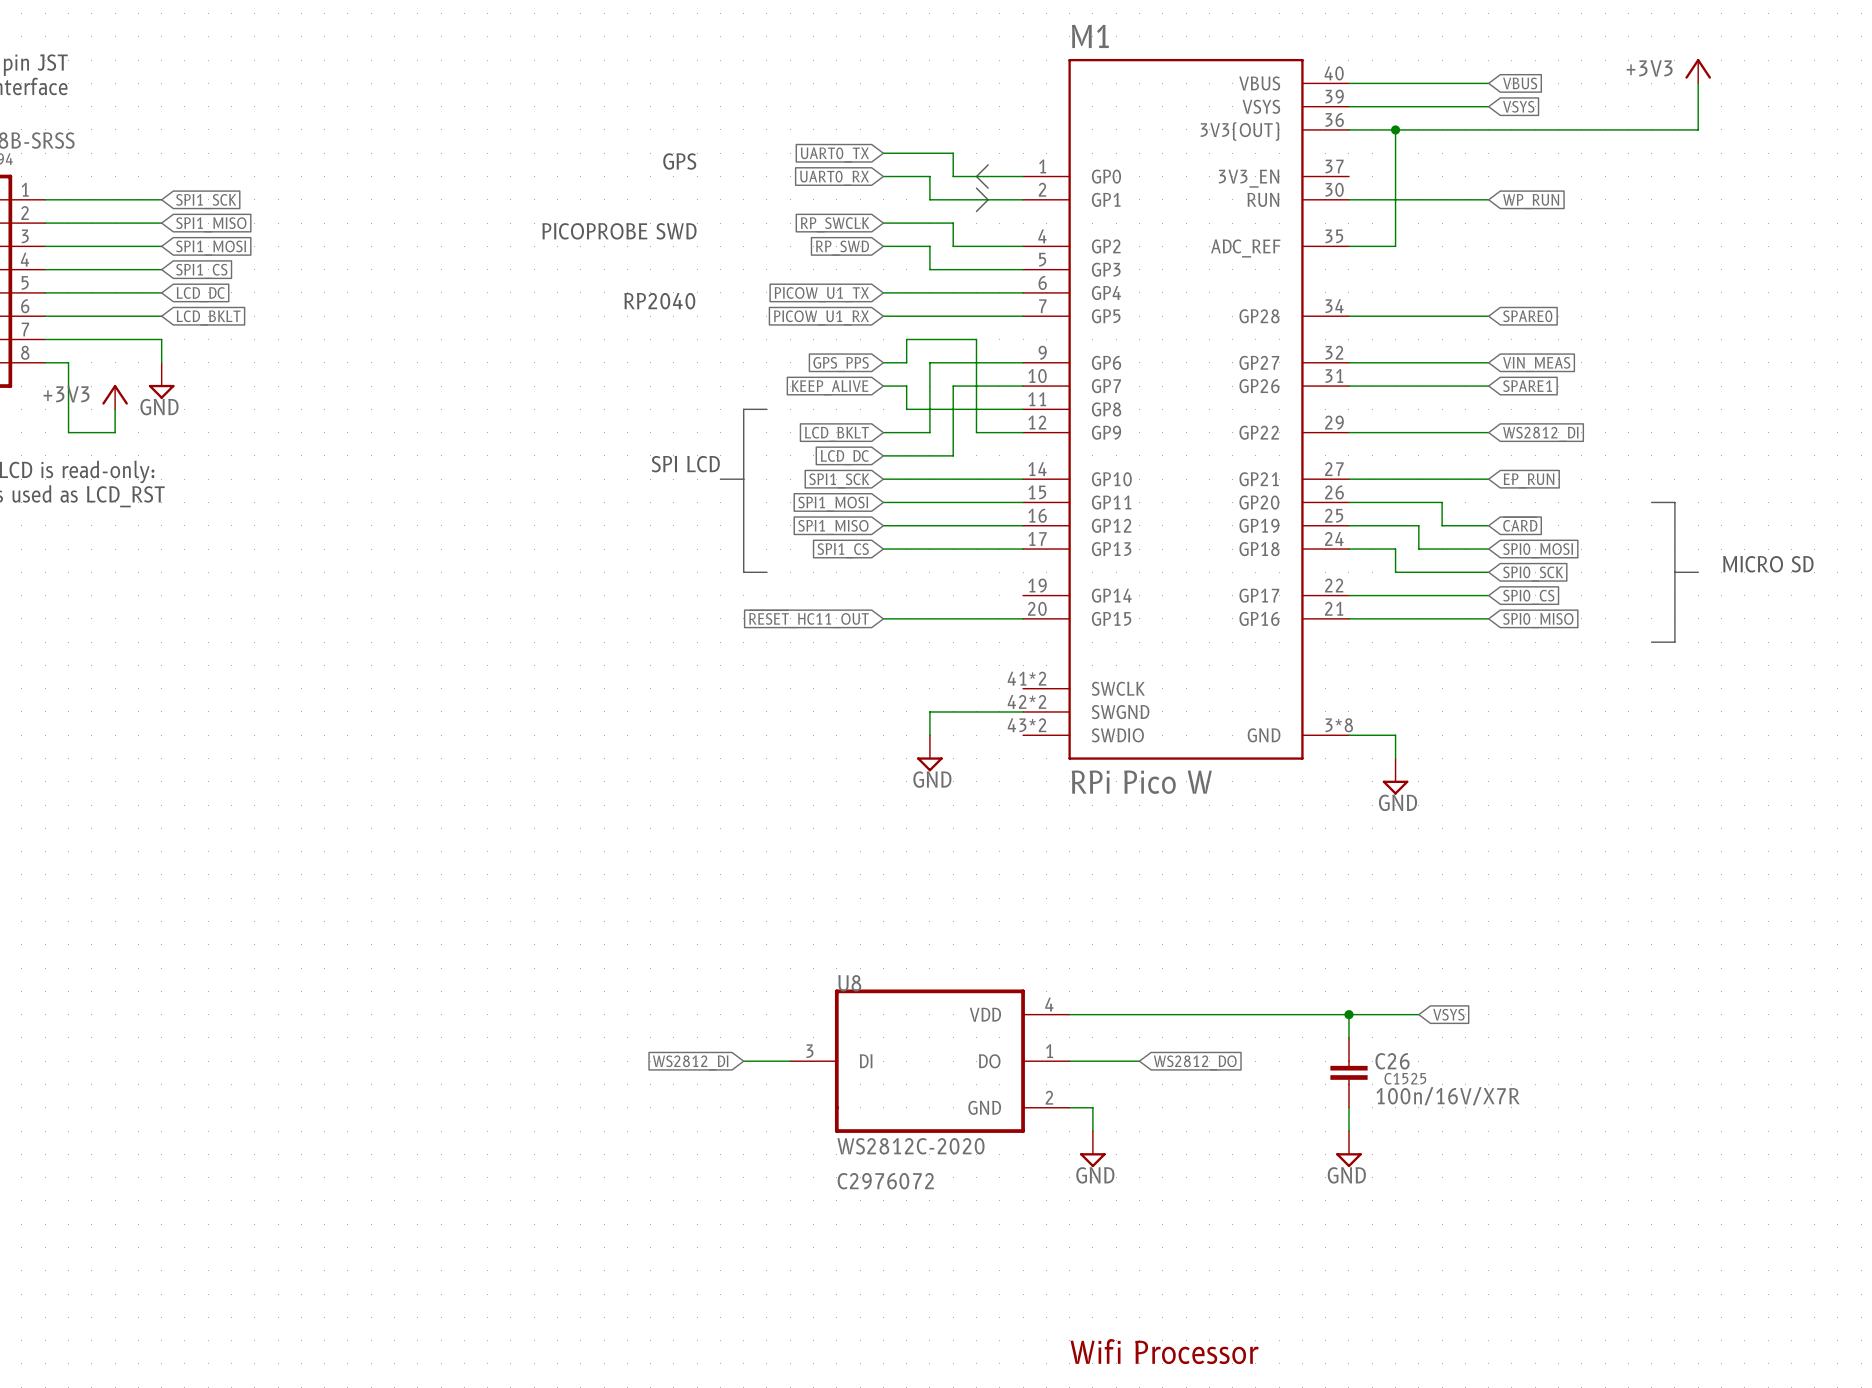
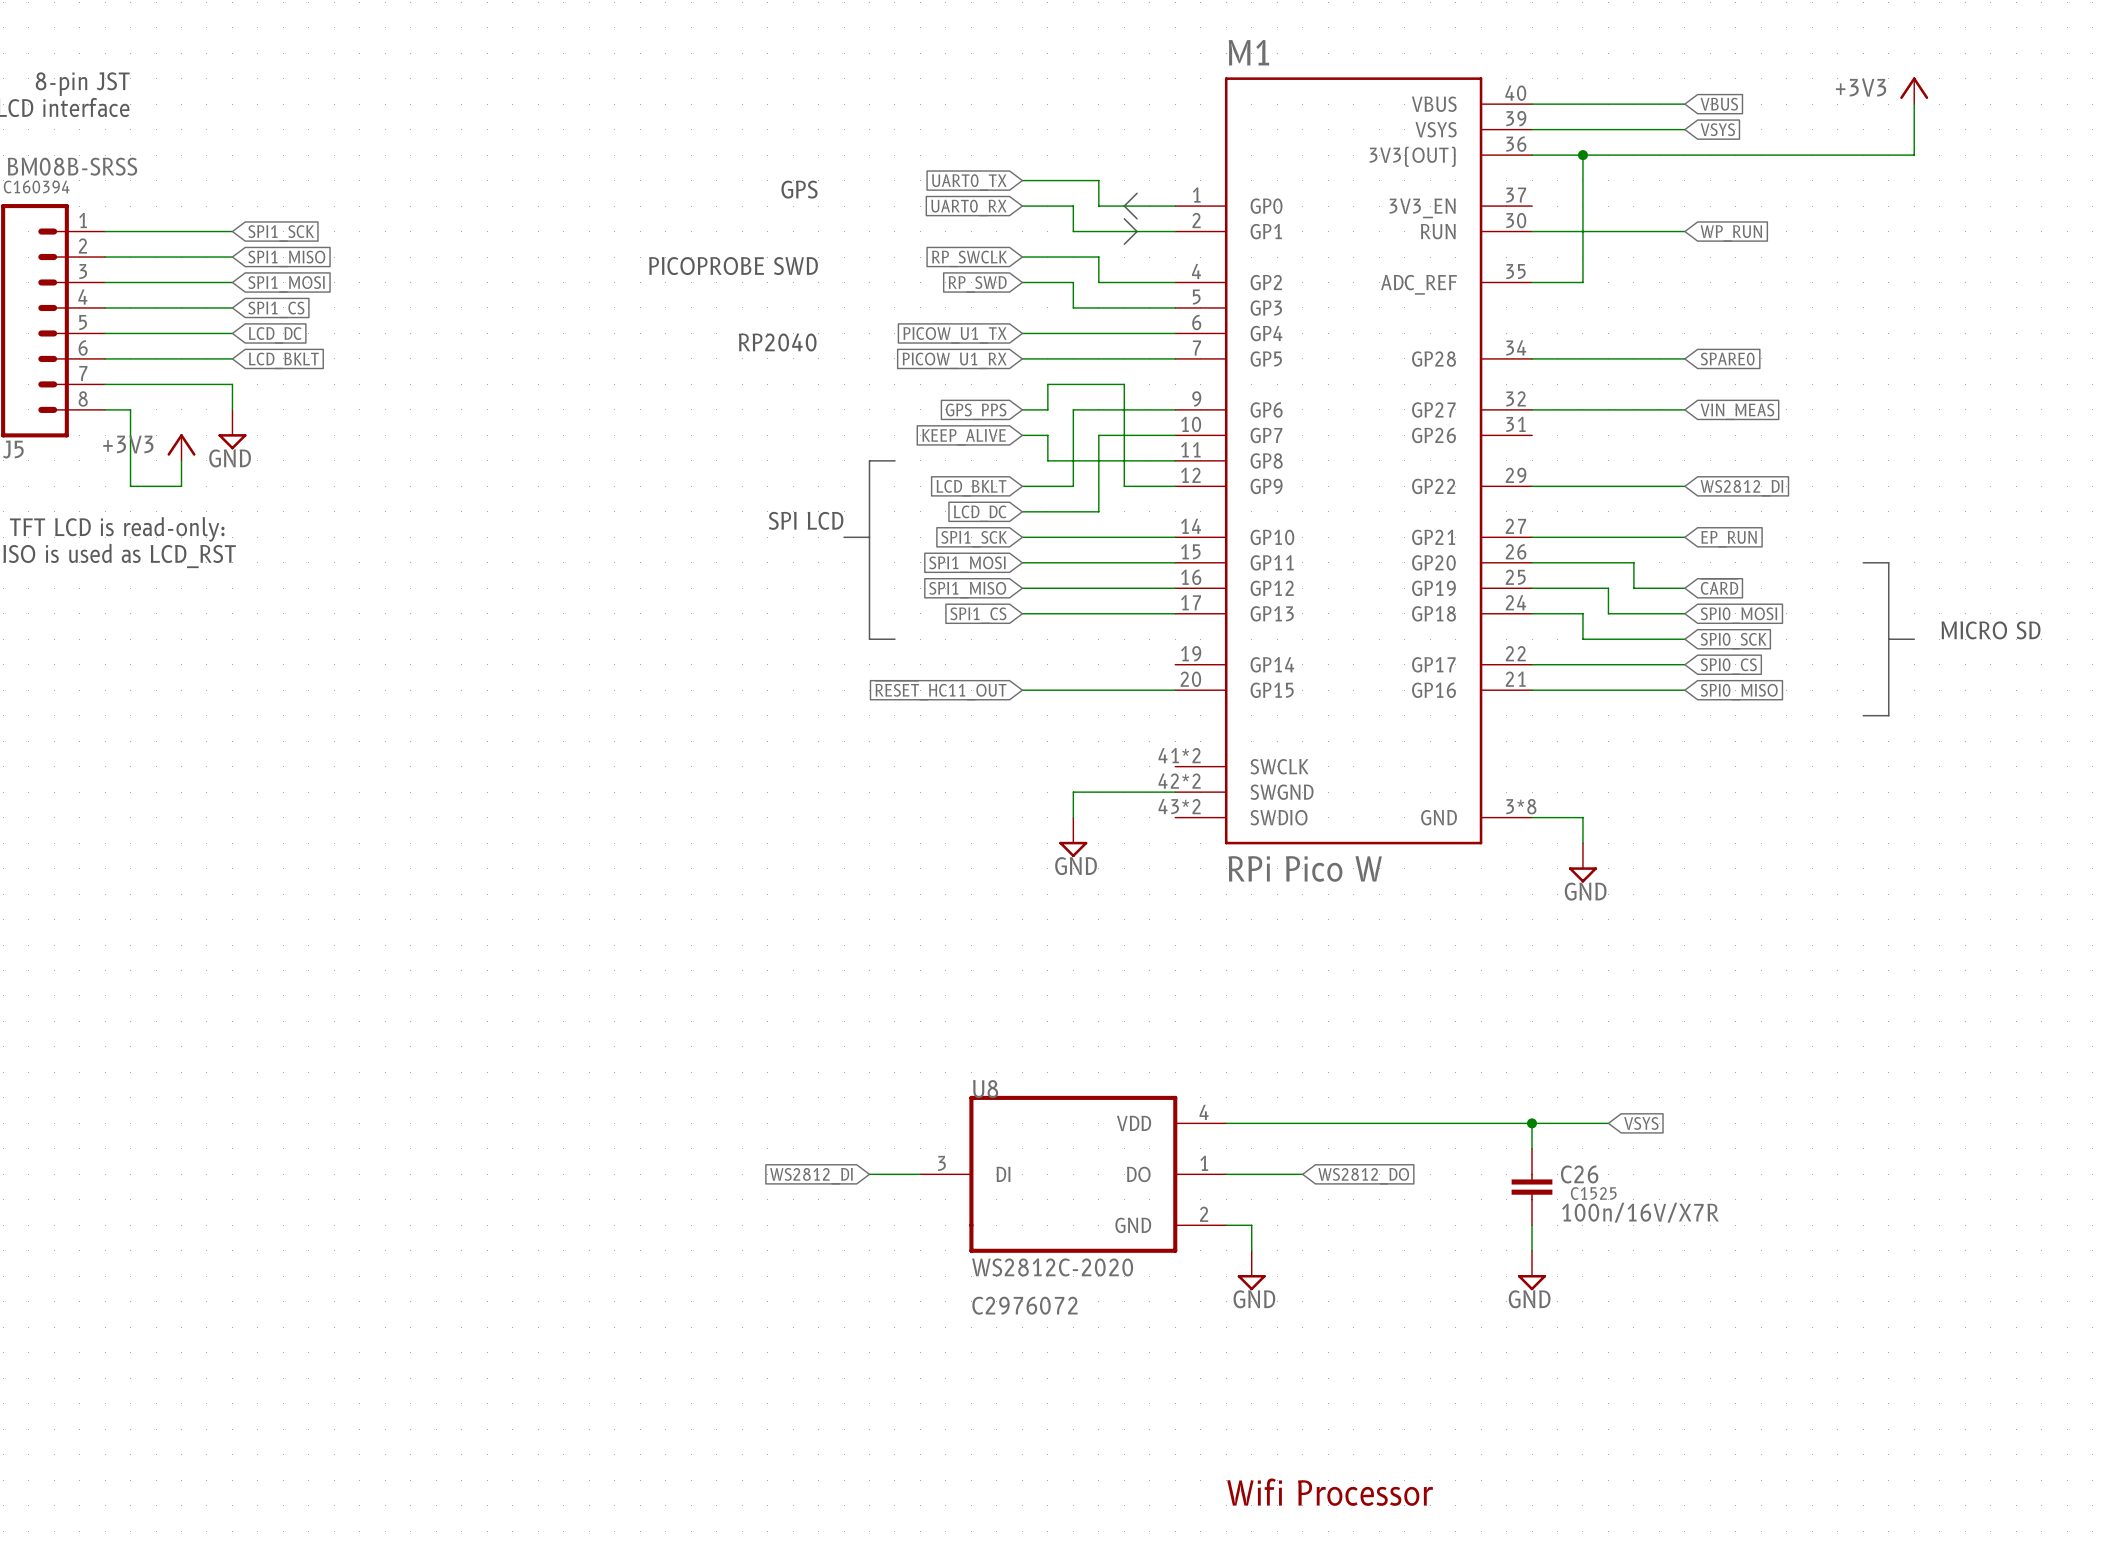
wire: (1348, 386) (1488, 386) -> none
global label: SPARE1 (1527, 386) -> none

